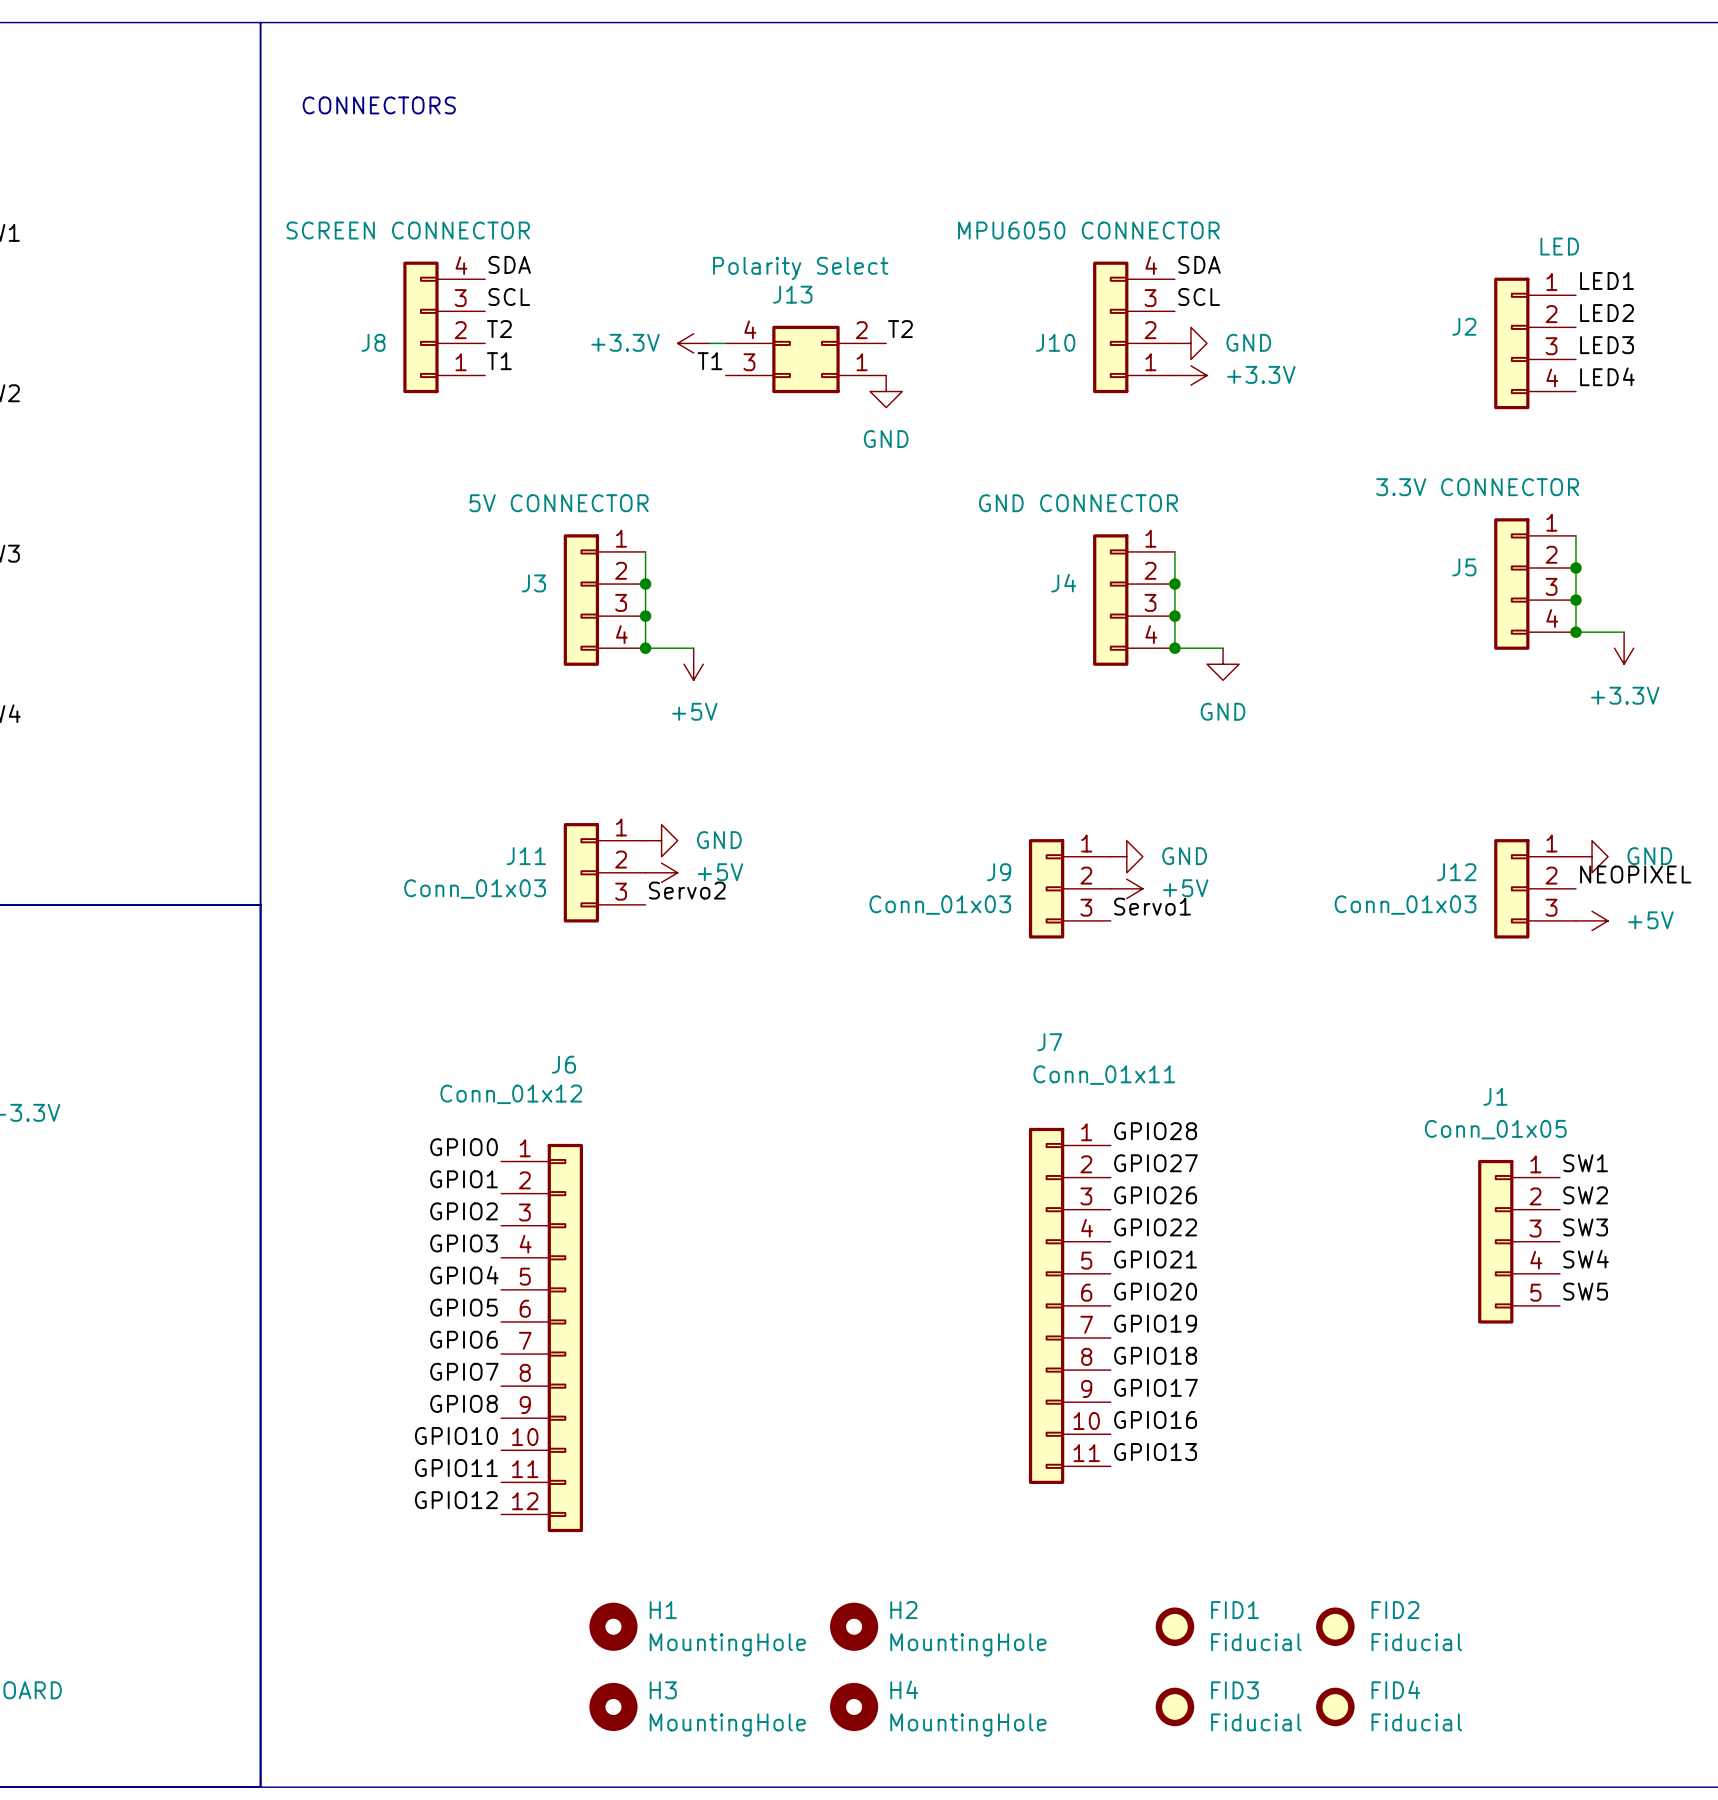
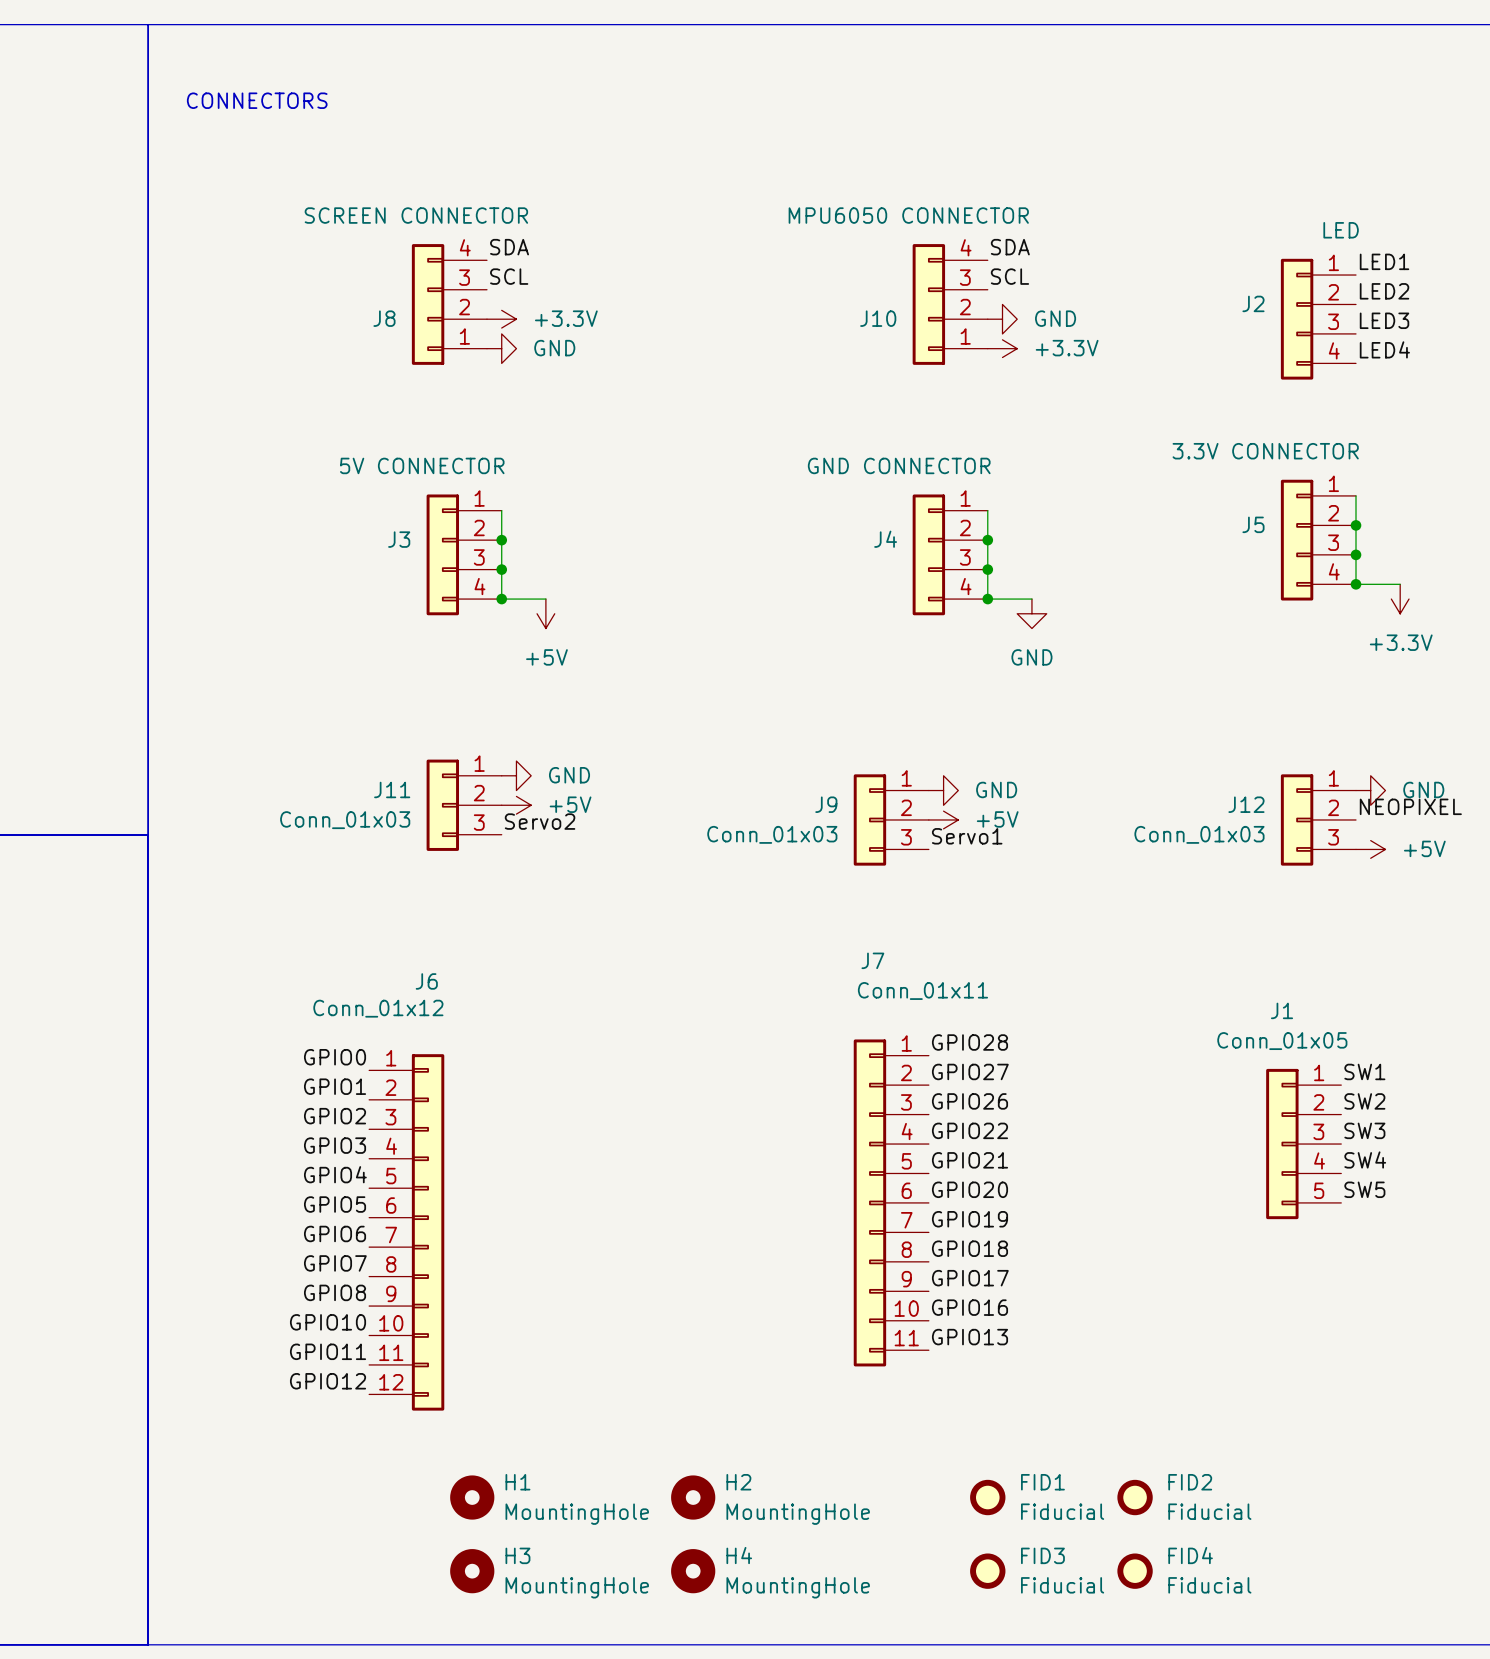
label position: SDA (509, 264) -> SDA (509, 247)
label position: SCL (509, 297) -> SCL (509, 276)
J8 position: (444, 327) -> (449, 304)
label: T2 (499, 329) -> none
label: T2 (900, 329) -> none
power symbol rotation: 0° (693, 343) -> 180° (501, 319)
power symbol position: +3.3V (693, 343) -> +3.3V (501, 319)
wire: (709, 343) (725, 343) -> none
J13: Polarity Select (805, 359) -> none
label: T1 (499, 361) -> none
label: T1 (709, 361) -> none
power symbol rotation: 0° (886, 391) -> 90° counterclockwise (501, 348)
power symbol position: GND (886, 391) -> GND (501, 348)

